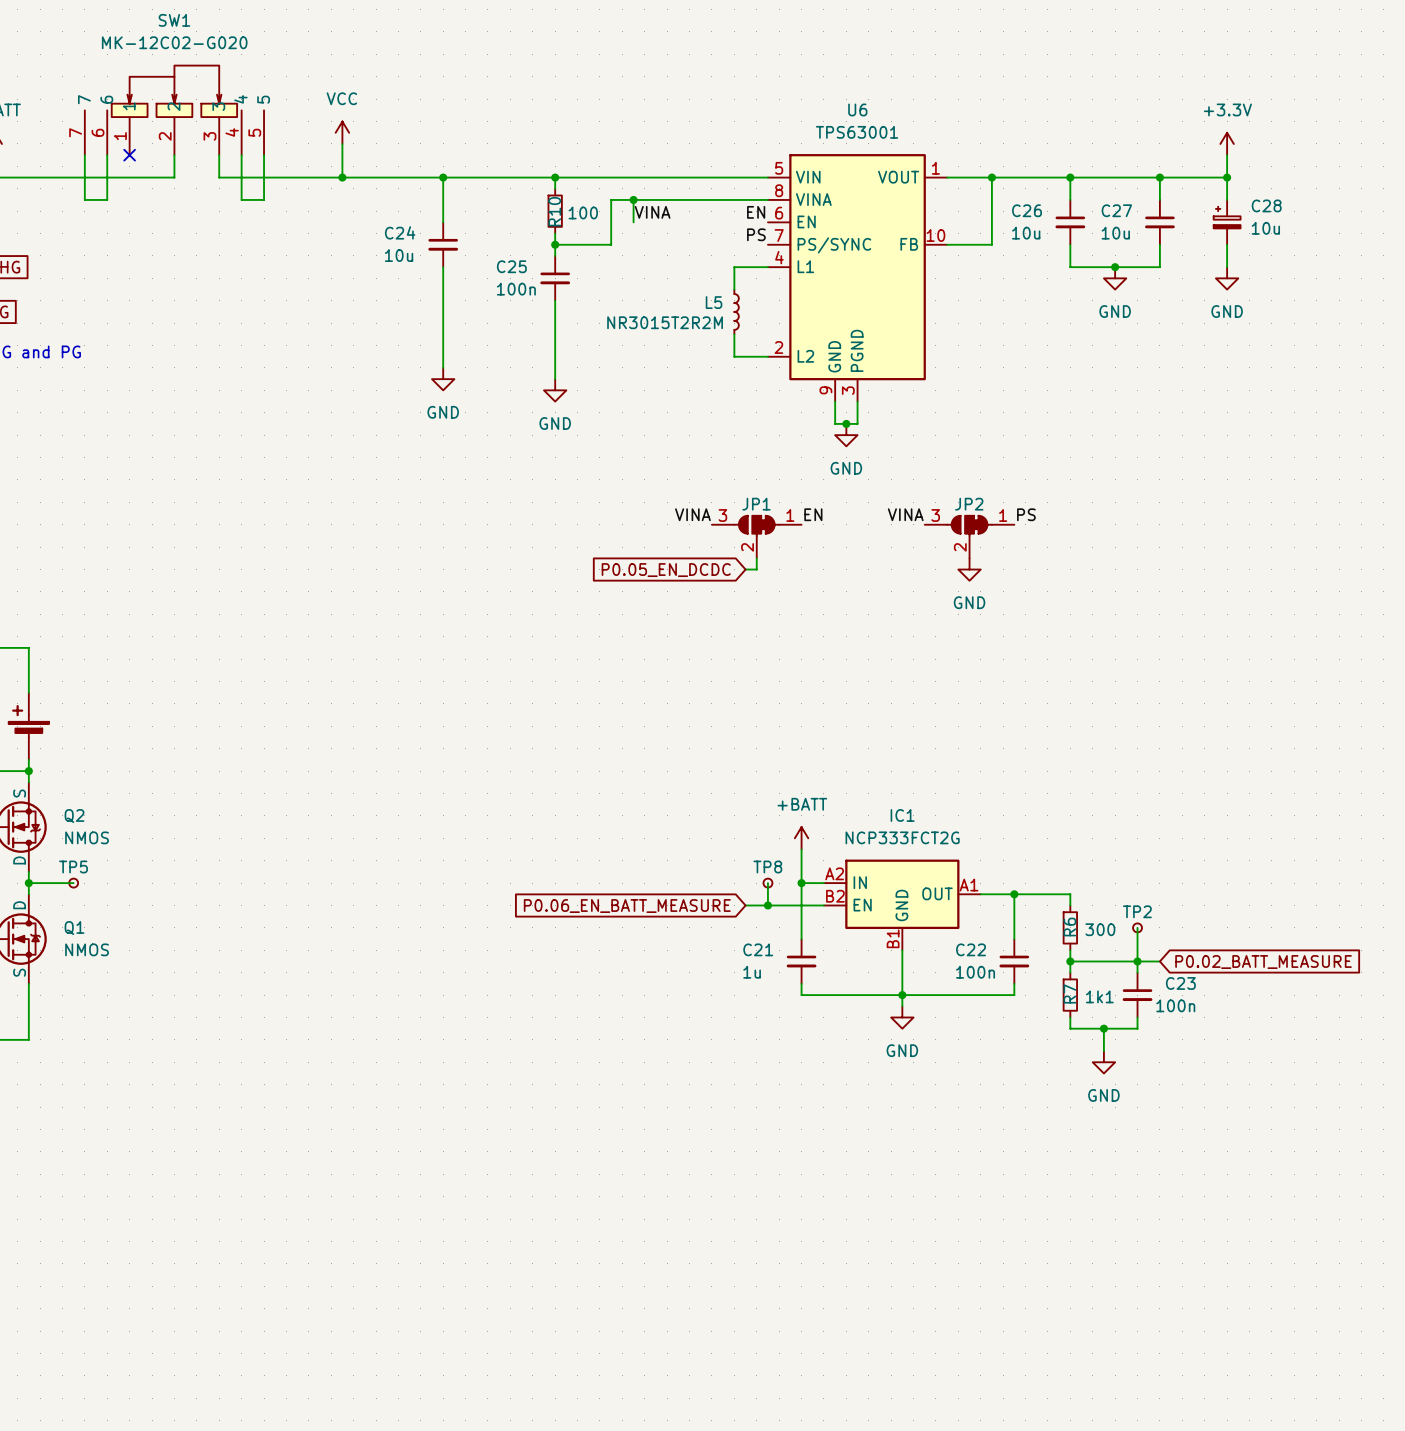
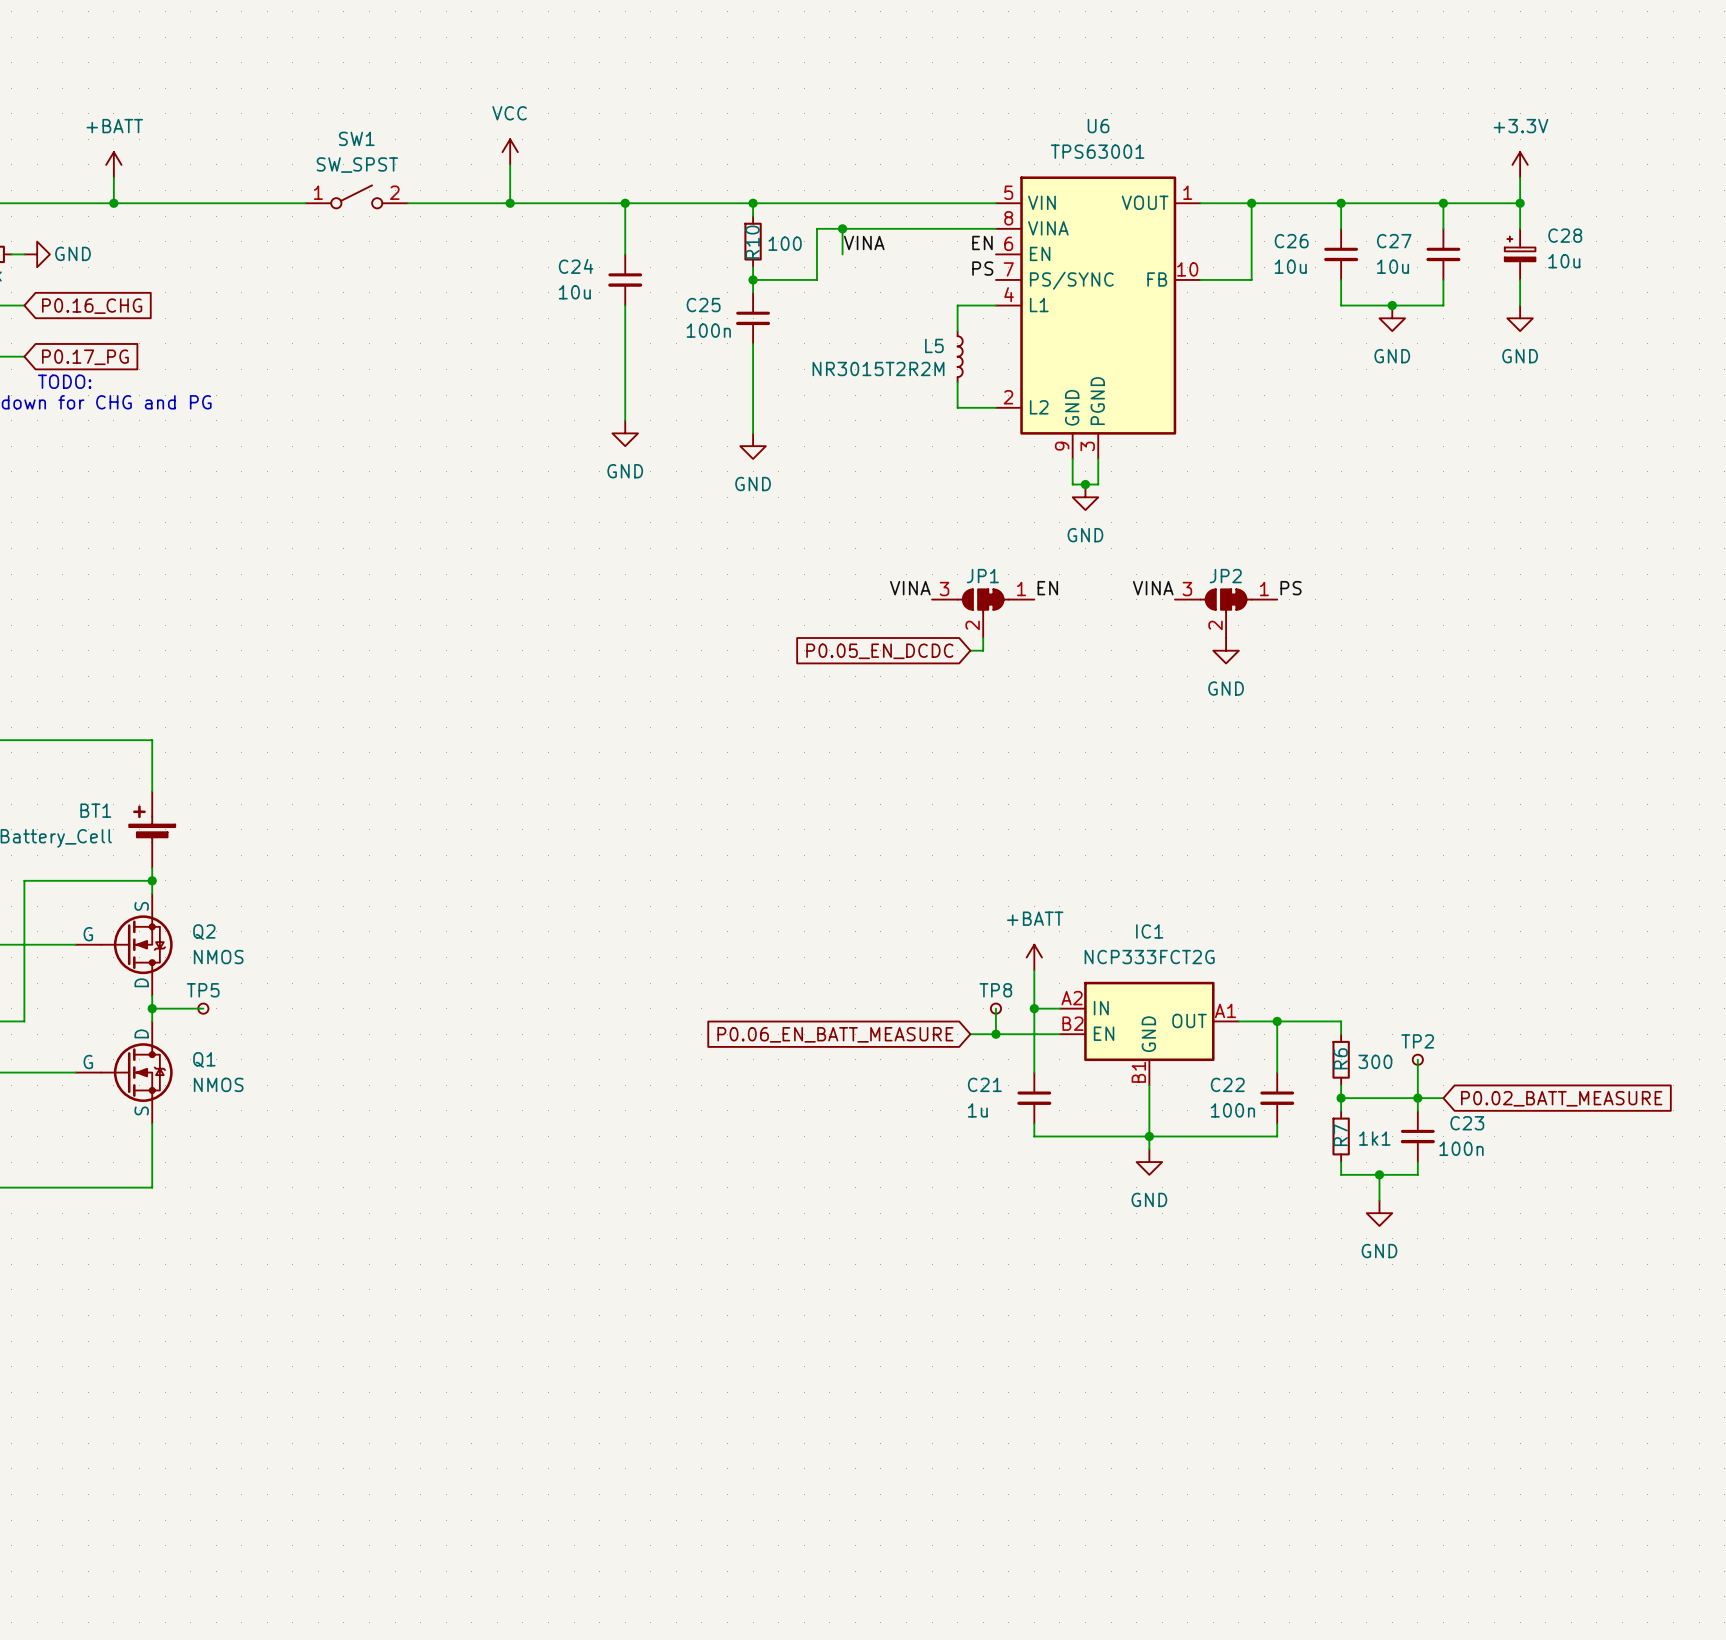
SW1 name position: SW1 (174, 20) -> SW1 (356, 138)
SW1 value: MK-12C02-G020 (174, 42) -> SW_SPST (357, 165)
SW1 symbol: [84, 65, 265, 156] -> [305, 185, 408, 209]
wire: (84, 155) (84, 199) (107, 199) (107, 155) -> none
no-connect mark: (129, 155) -> none
wire: (219, 155) (219, 177) (252, 177) -> none
wire: (241, 155) (241, 199) (264, 199) (264, 155) -> none

